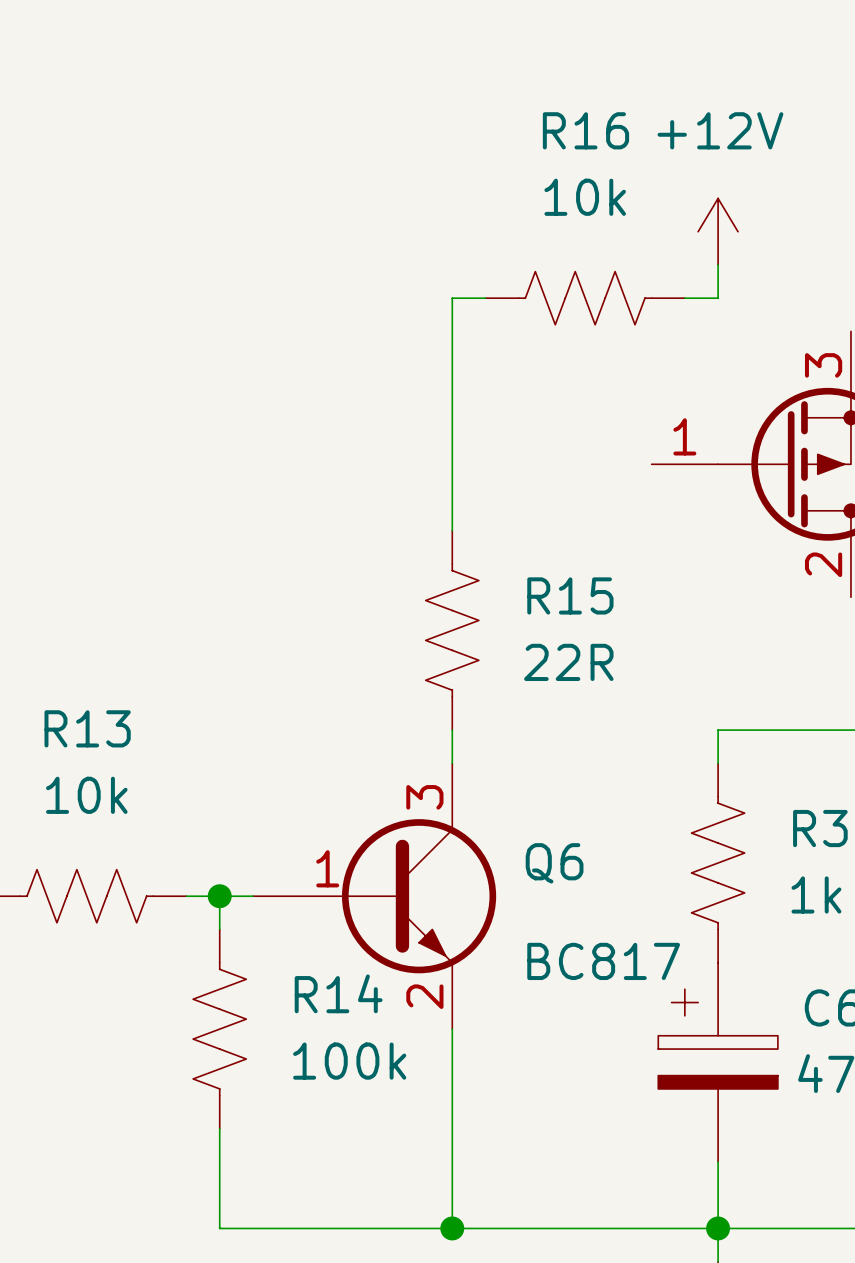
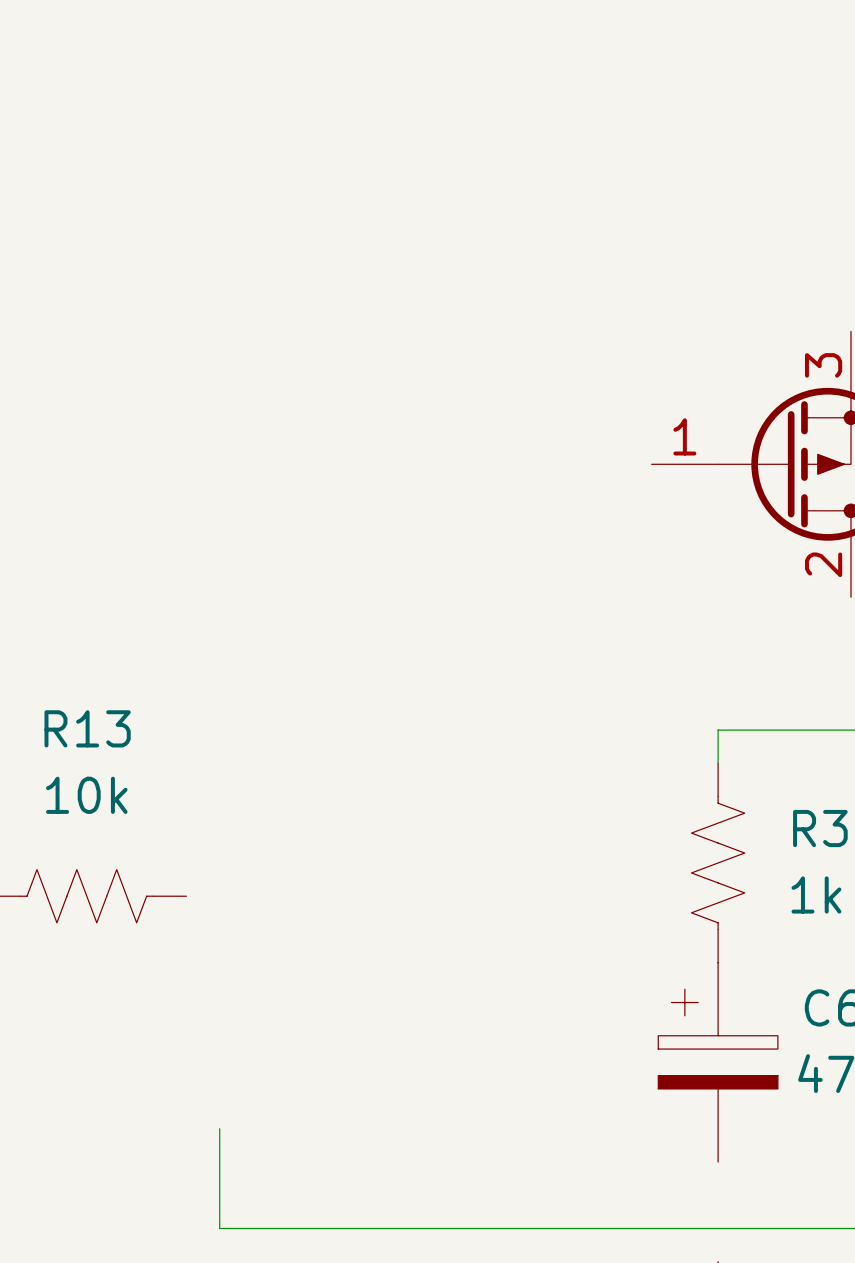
power symbol: +12V (718, 231) -> none
wire: (718, 264) (718, 298) (684, 298) -> none
wire: (485, 298) (452, 298) (452, 530) -> none
R16: 10k (585, 298) -> none
R15: 22R (452, 630) -> none
wire: (452, 730) (452, 763) -> none
wire: (186, 896) (252, 896) -> none
wire: (219, 896) (219, 929) -> none
junction: (219, 896) -> none
Q6: BC817 (374, 896) -> none
R14: 100k (219, 1029) -> none
wire: (452, 1029) (452, 1228) -> none
wire: (718, 1162) (718, 1261) -> none
junction: (452, 1228) -> none
junction: (718, 1228) -> none

